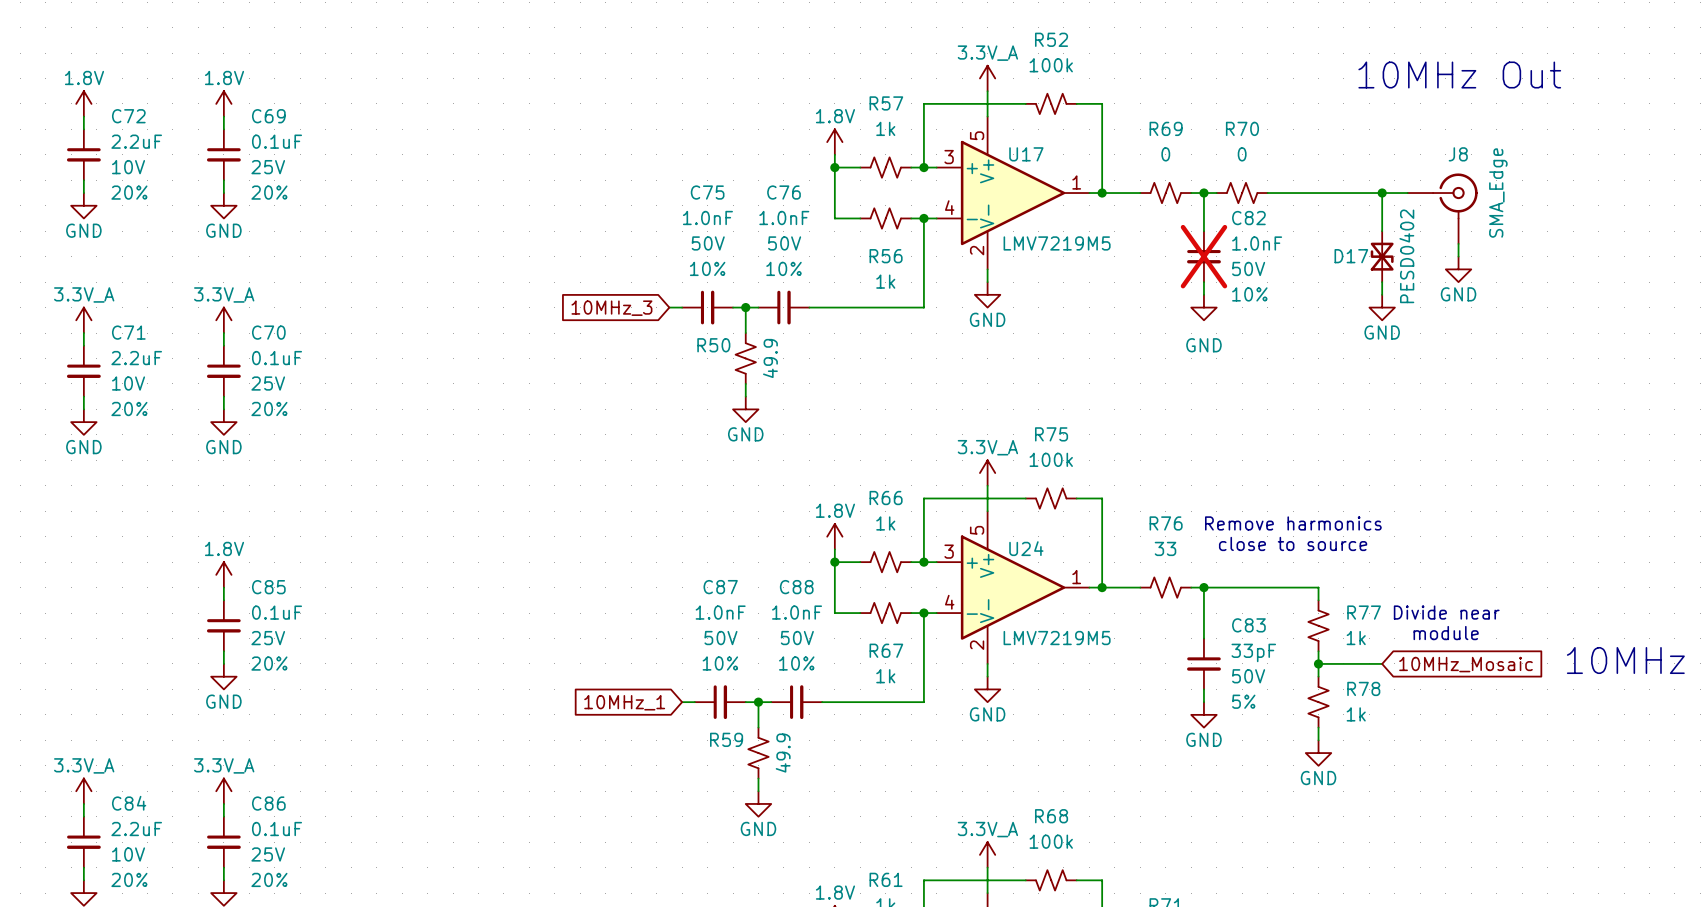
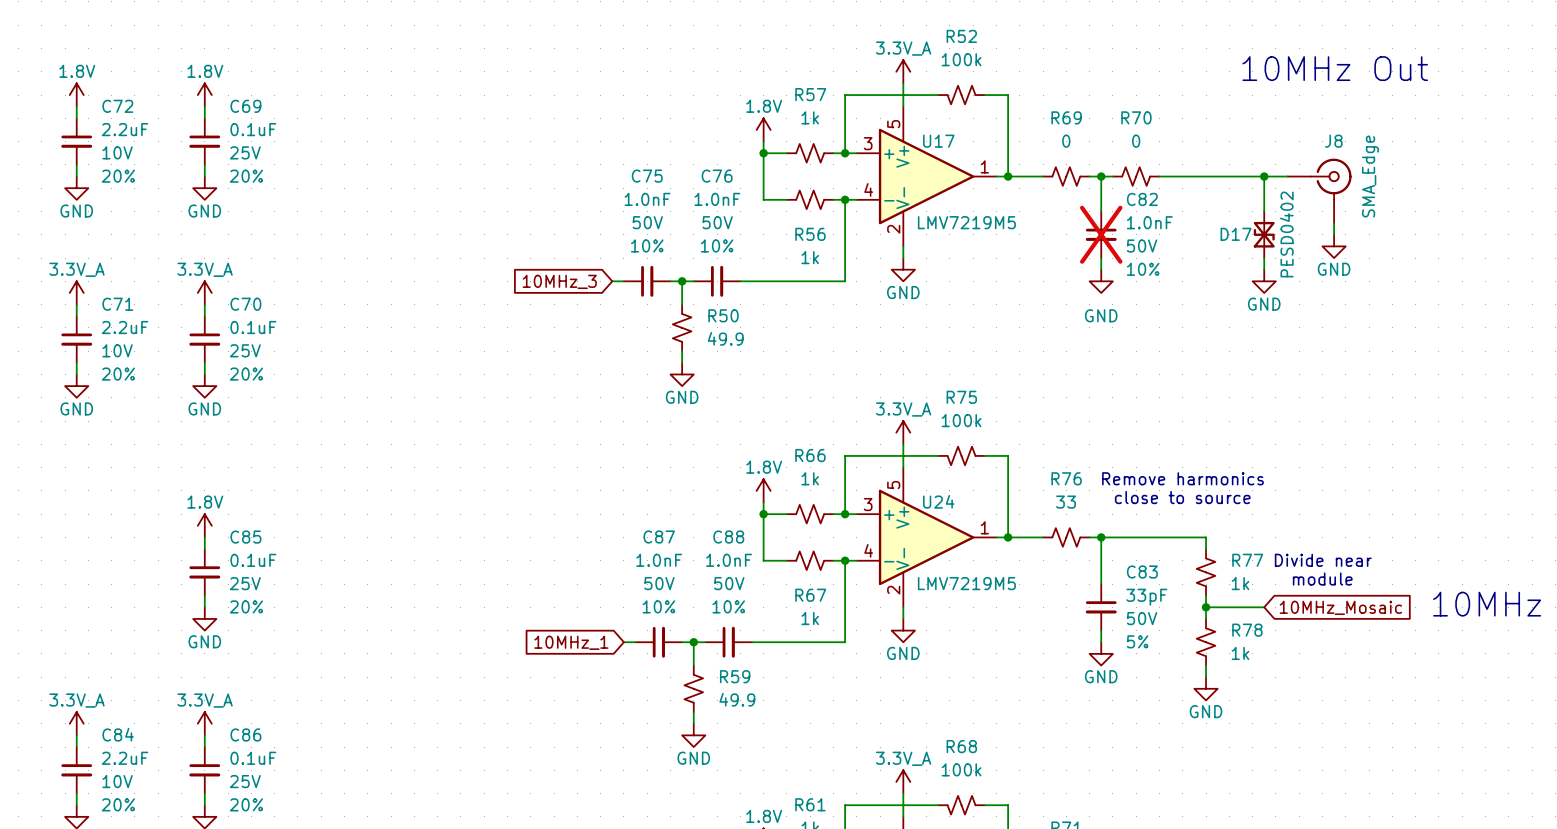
R50 name position: R50 (713, 345) -> R50 (723, 315)
R50 value rotation: 0° (770, 358) -> 90° clockwise (725, 338)
R59 name position: R59 (726, 739) -> R59 (735, 676)
R59 value rotation: 0° (783, 753) -> 90° clockwise (737, 699)

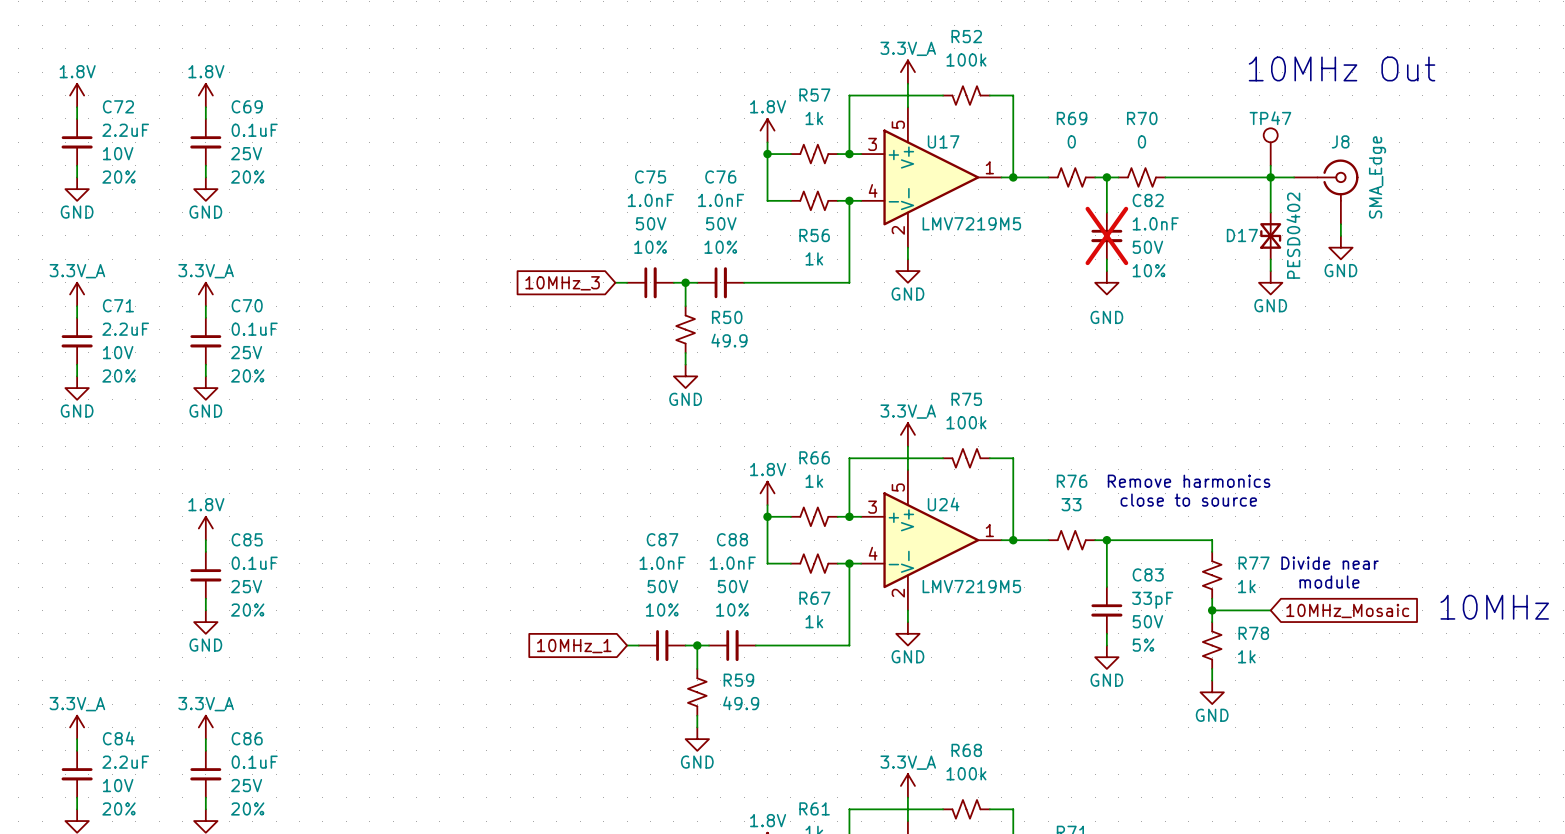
TP47: none -> (1270, 147)
wire: none -> (1270, 165) (1270, 177)

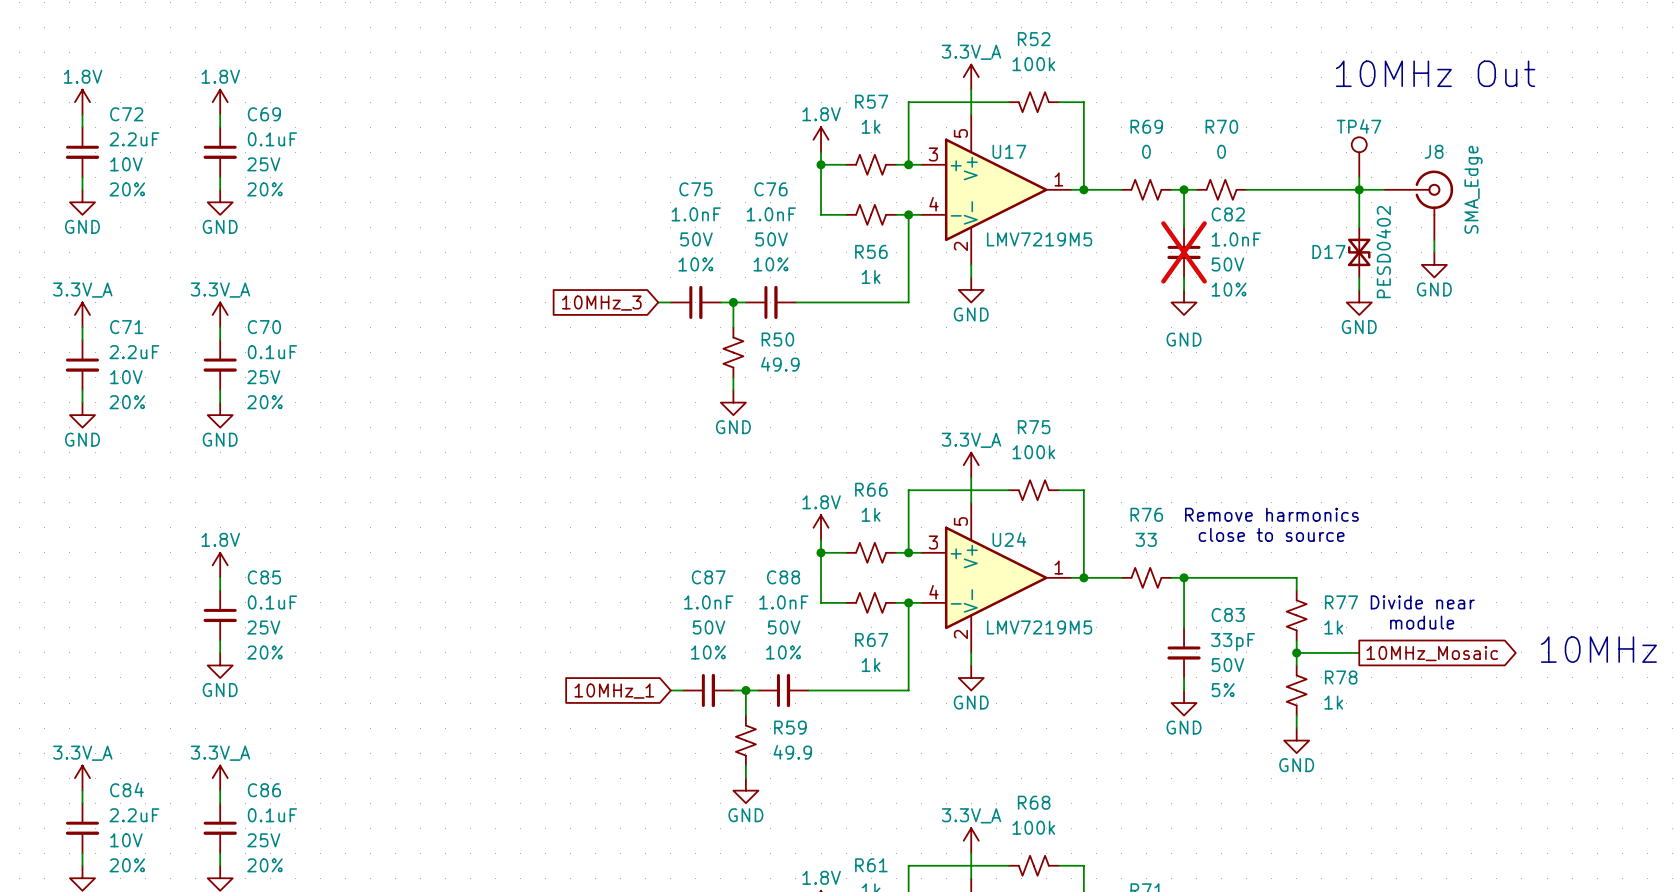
global label shape: input (1347, 610) -> output (1432, 653)

